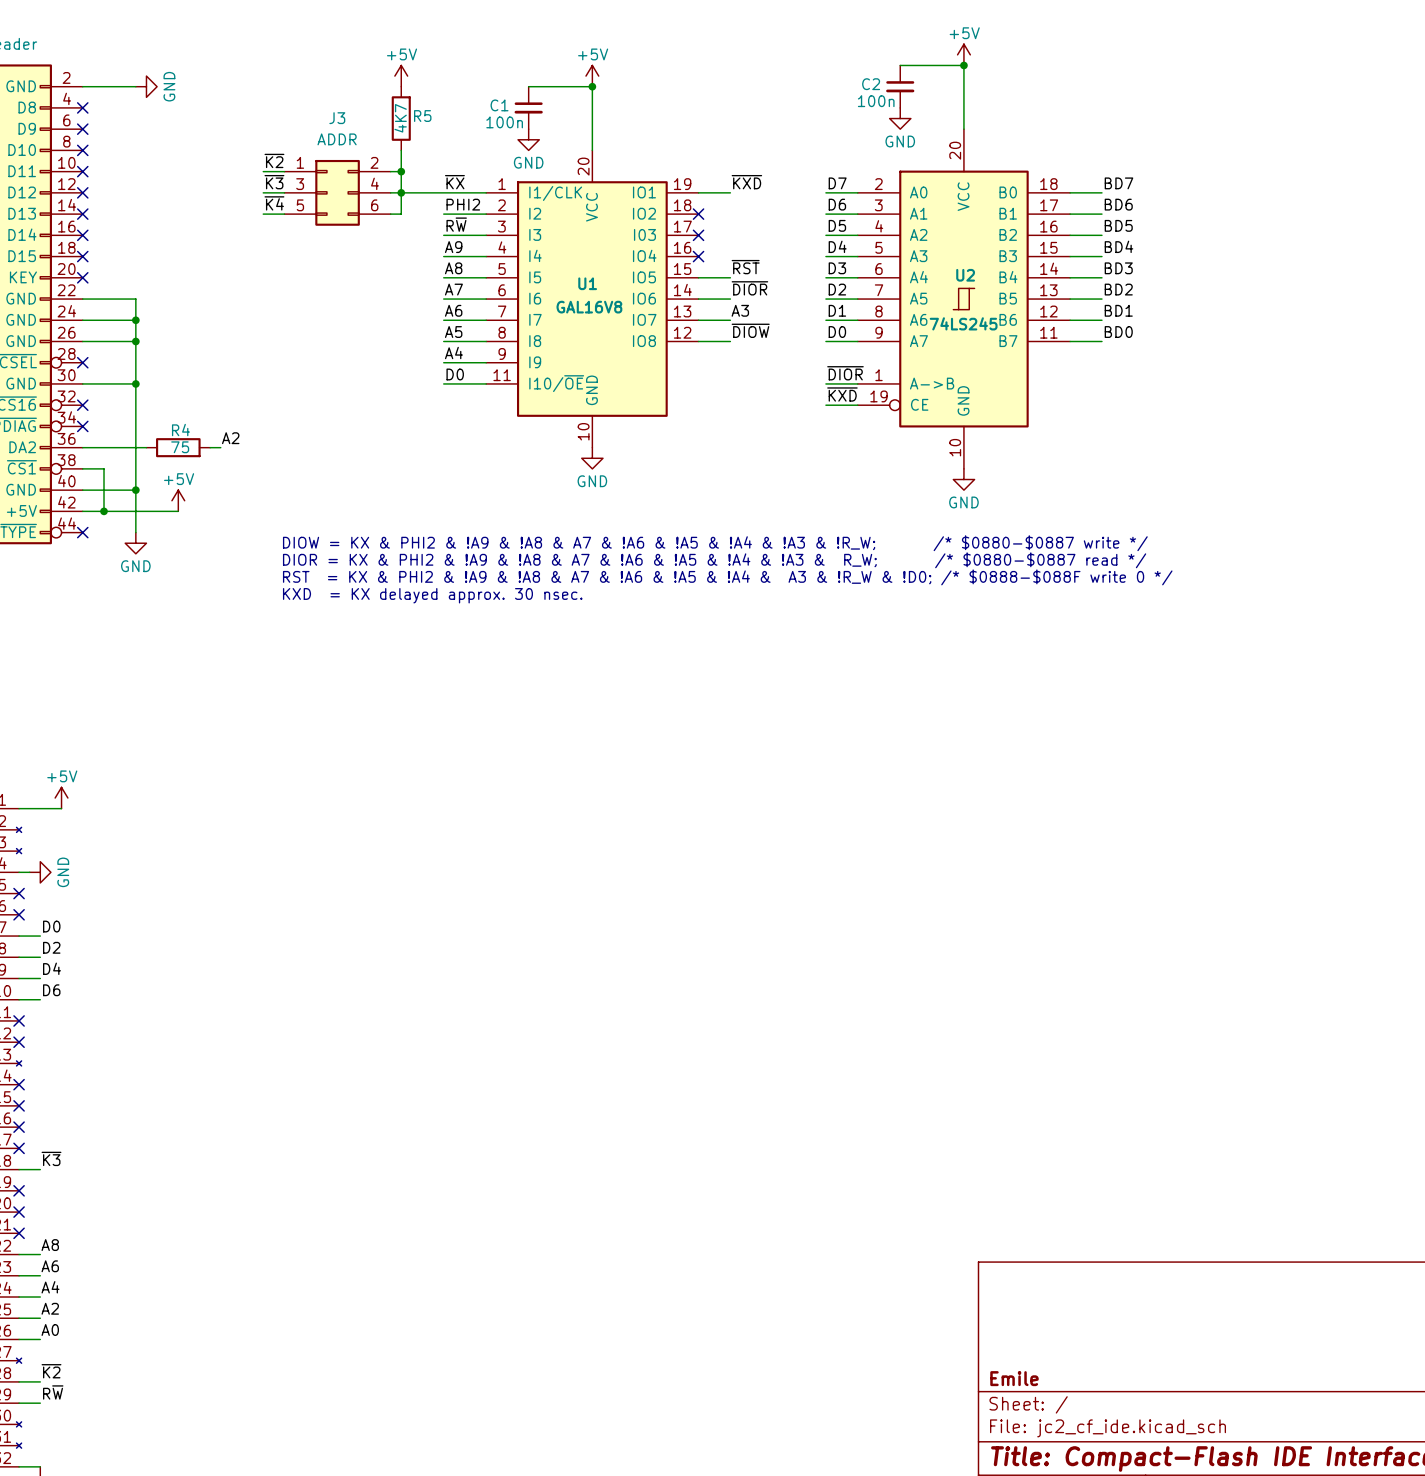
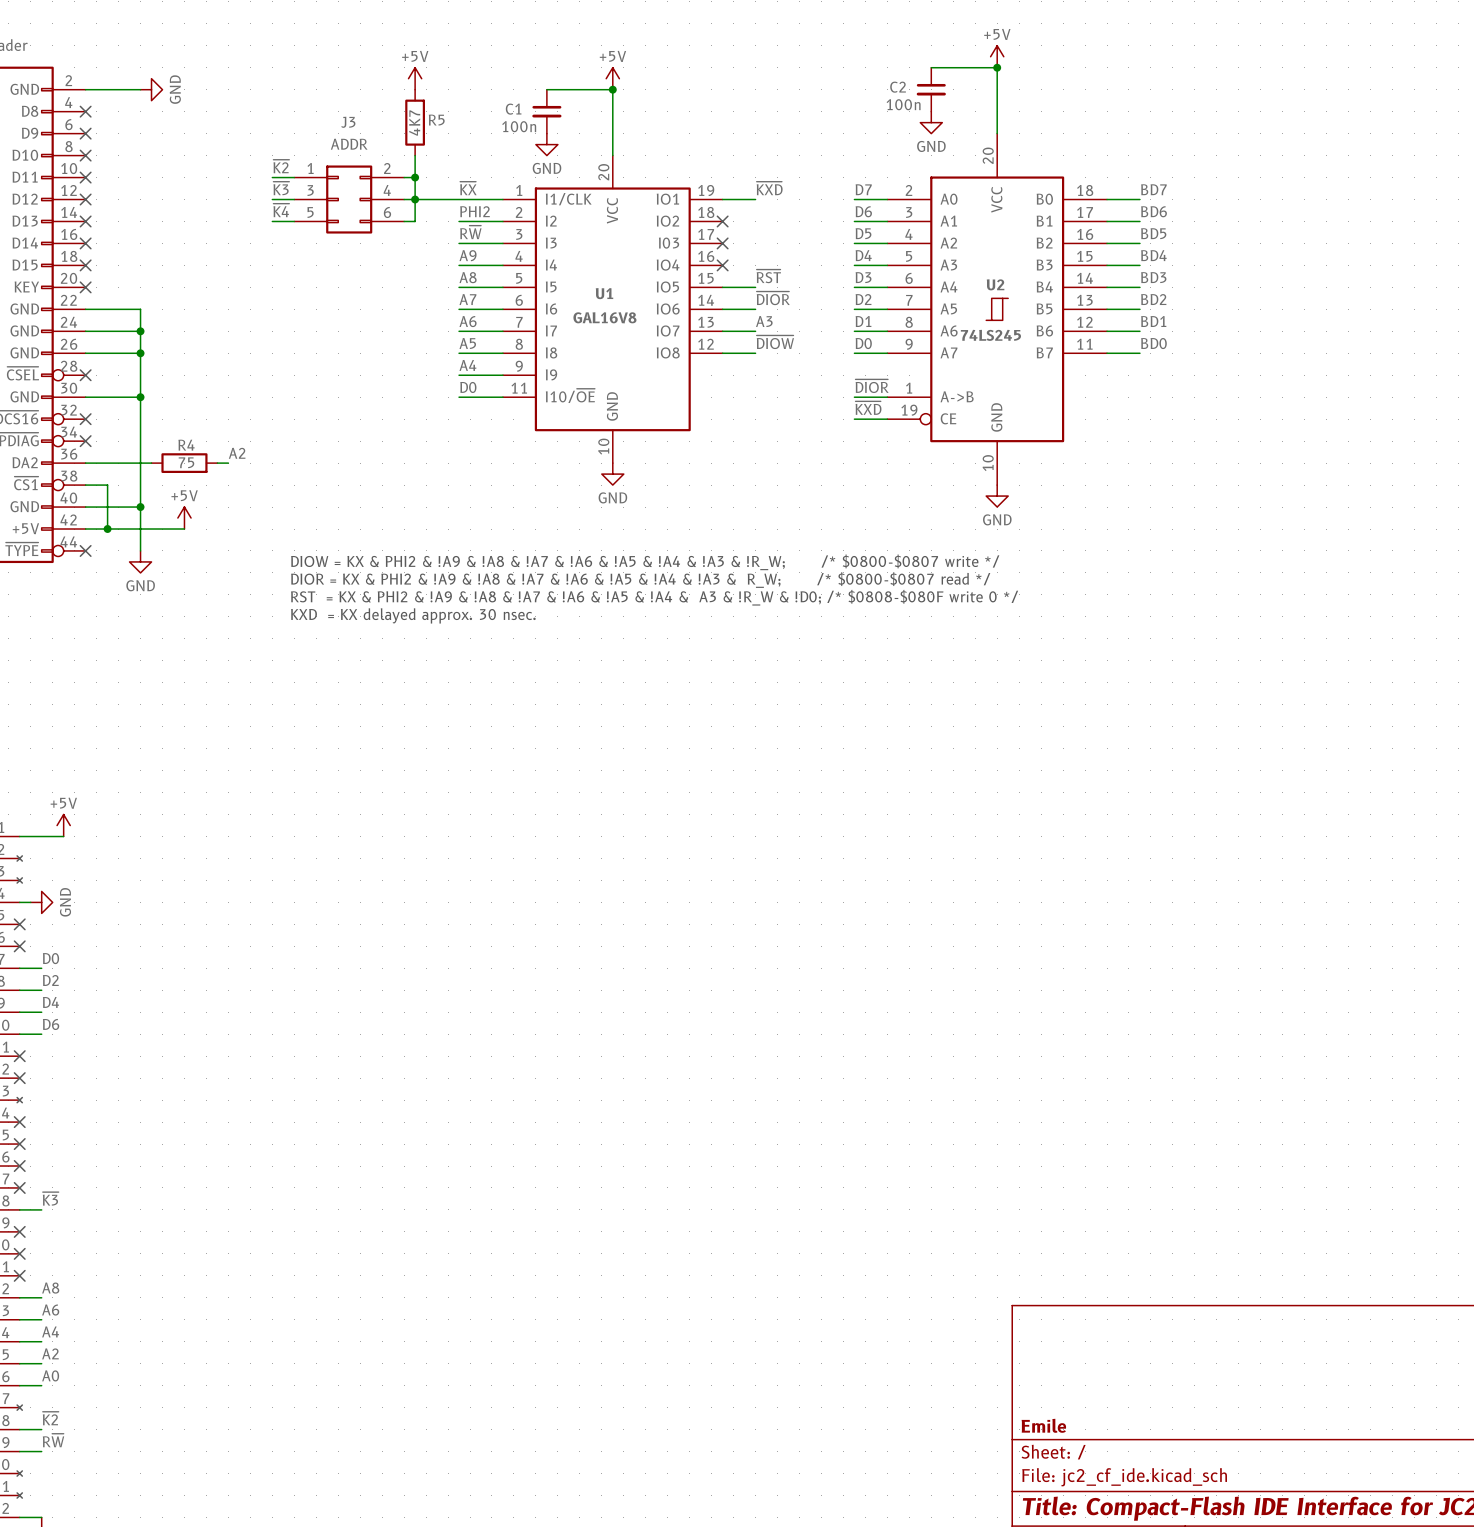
text: DIOW = KX & PHI2 & !A9 & !A8 & A7 & !A6 & !A5 & !A4 & !A3 & !R_W; /* $0880-$0887 write */ (715, 543) -> DIOW = KX & PHI2 & !A9 & !A8 & !A7 & !A6 & !A5 & !A4 & !A3 & !R_W; /* $0800-$0807 write */ (645, 562)
text: DIOR = KX & PHI2 & !A9 & !A8 & A7 & !A6 & !A5 & !A4 & !A3 & R_W; /* $0880-$0887 read */ (714, 560) -> DIOR = KX & PHI2 & !A9 & !A8 & !A7 & !A6 & !A5 & !A4 & !A3 & R_W; /* $0800-$0807 read */ (640, 580)
text: RST = KX & PHI2 & !A9 & !A8 & A7 & !A6 & !A5 & !A4 & A3 & !R_W & !D0; /* $0888-$088F write 0 */ (727, 577) -> RST = KX & PHI2 & !A9 & !A8 & !A7 & !A6 & !A5 & !A4 & A3 & !R_W & !D0; /* $0808-$080F write 0 */ (654, 597)

